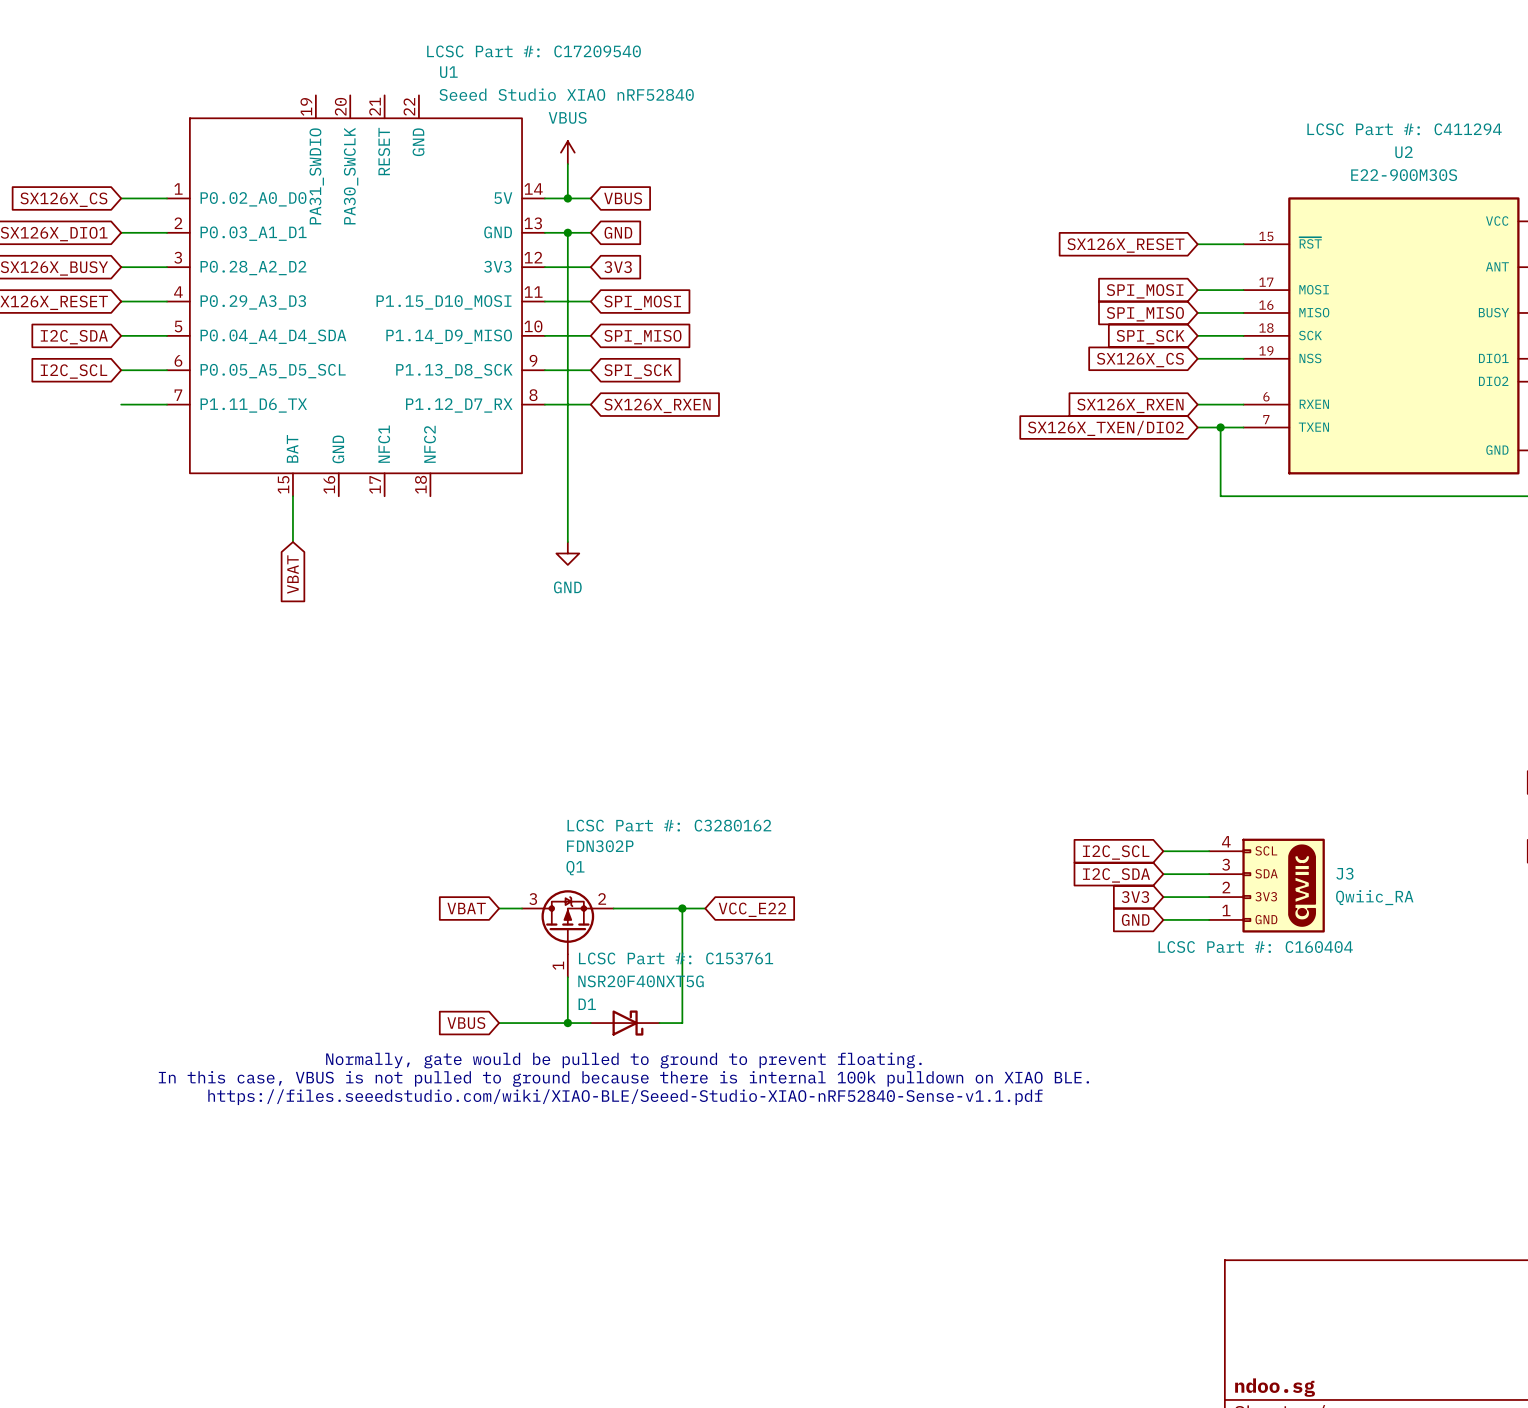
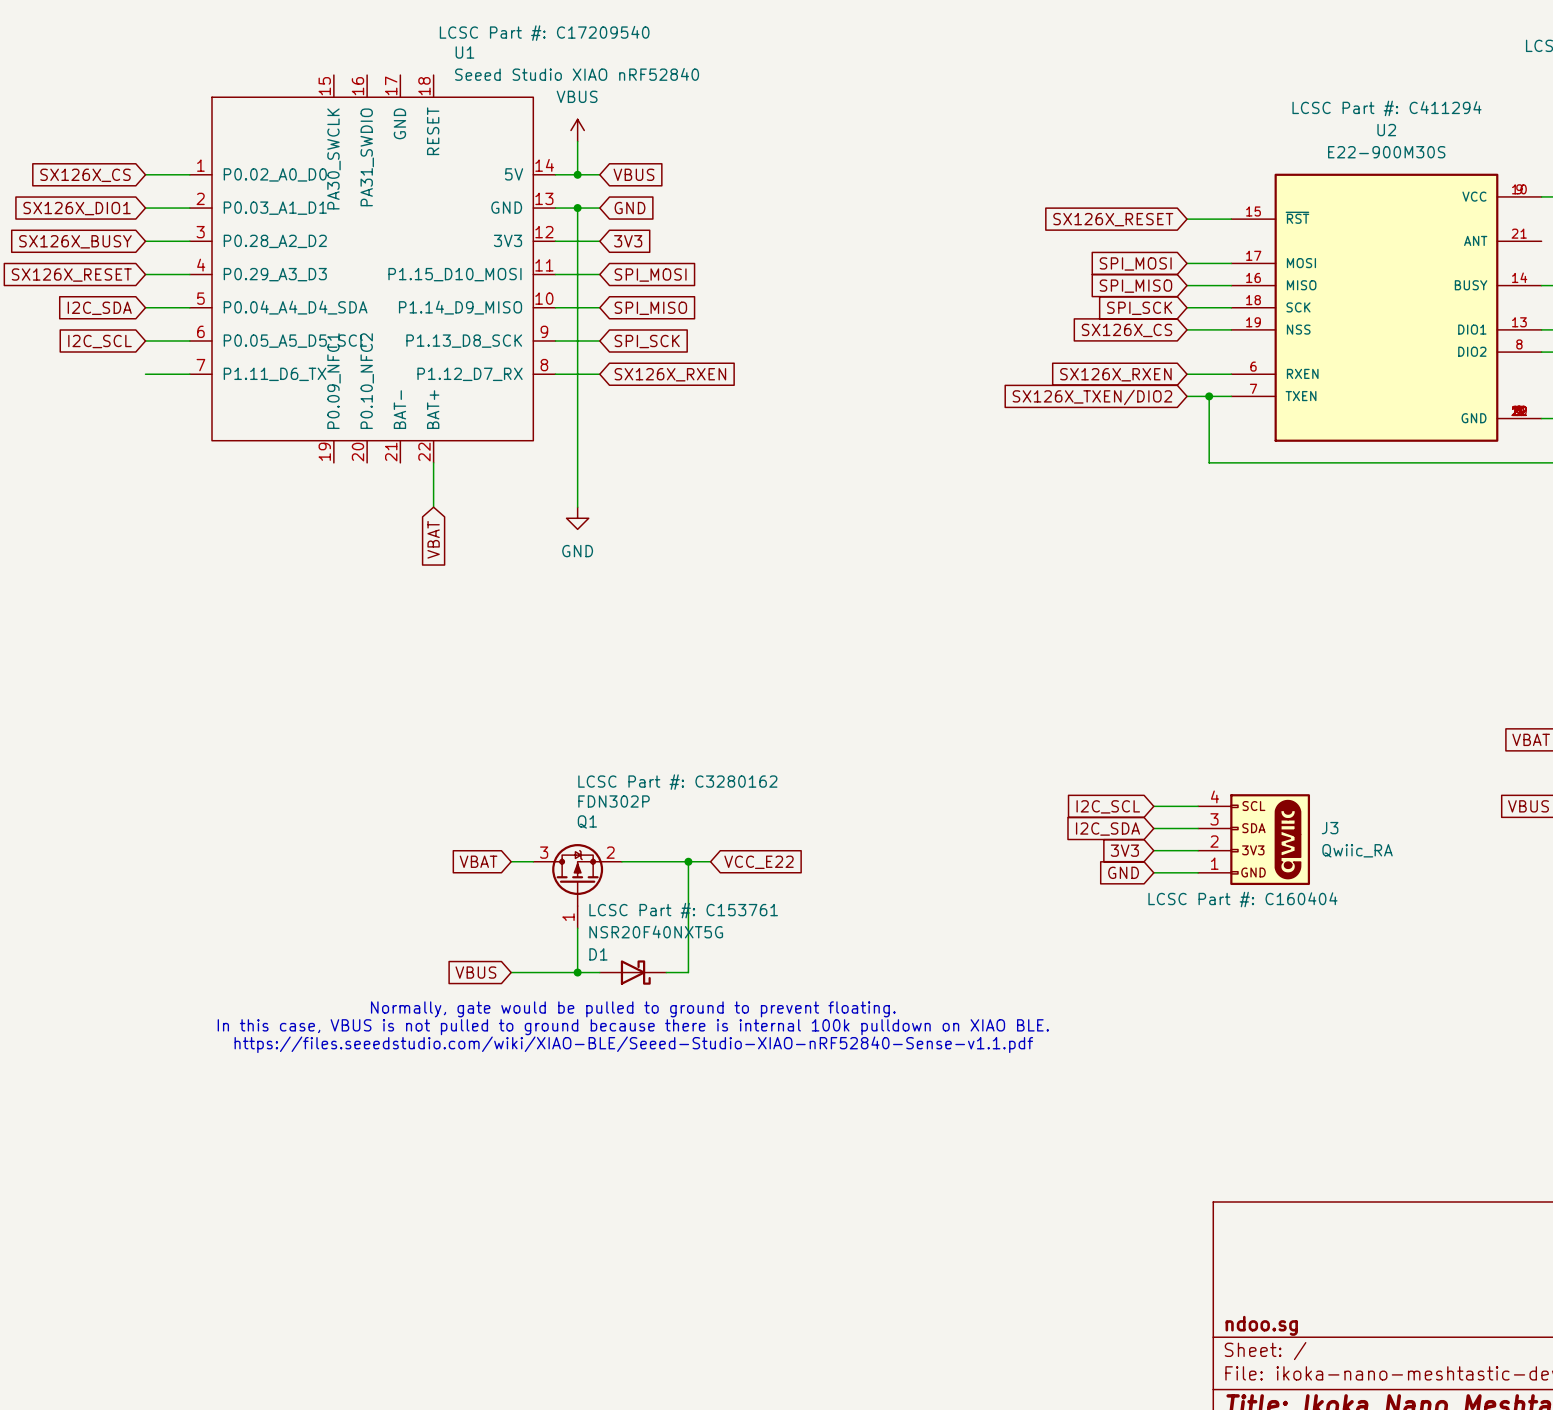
U1 symbol: [167, 95, 545, 497] -> [189, 75, 556, 463]
wire: (292, 496) (292, 542) -> (433, 462) (433, 507)
global label position: VBAT (292, 574) -> VBAT (433, 539)

